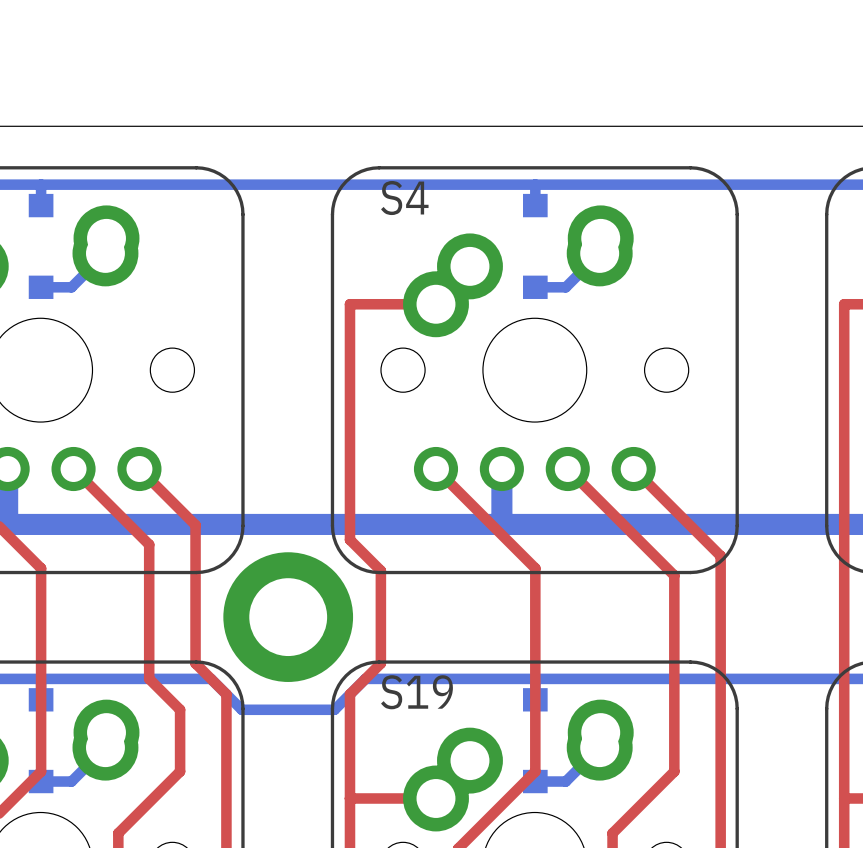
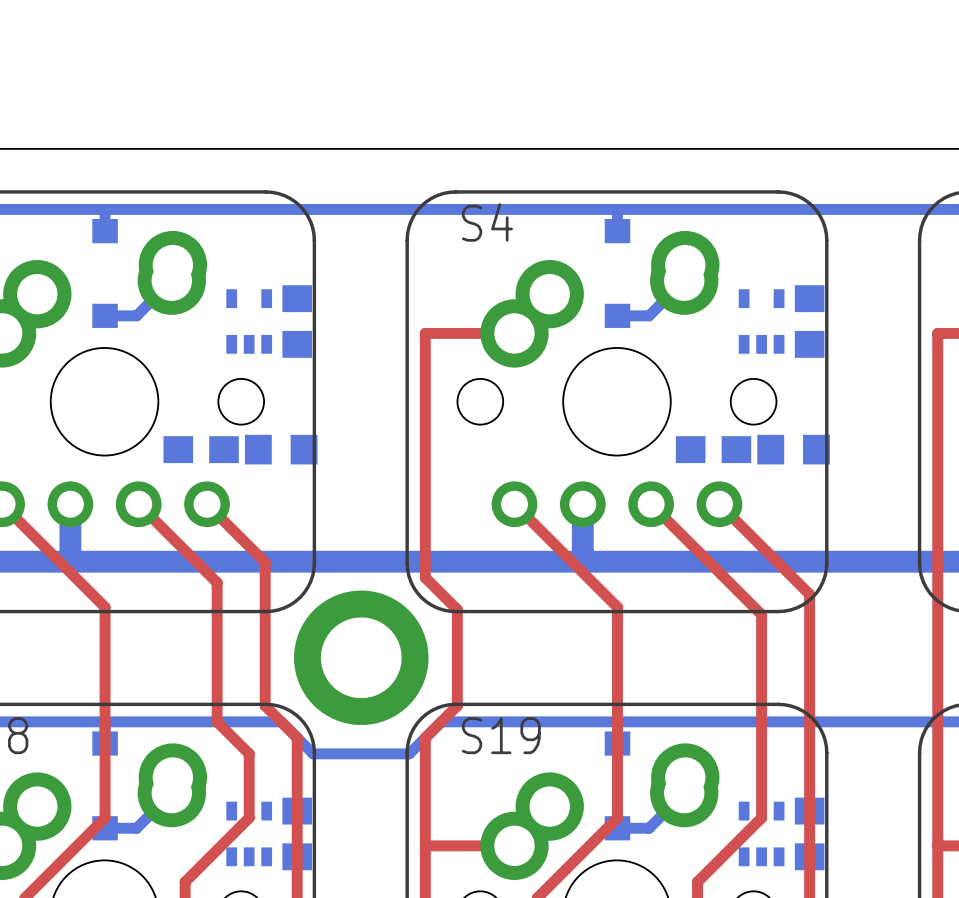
part: none -> (249, 321)
part: none -> (297, 321)
part: none -> (761, 321)
part: none -> (809, 321)
part: none -> (201, 449)
part: none -> (281, 449)
part: none -> (713, 449)
part: none -> (793, 449)
part: none -> (249, 833)
part: none -> (297, 833)
part: none -> (761, 833)
part: none -> (809, 833)

